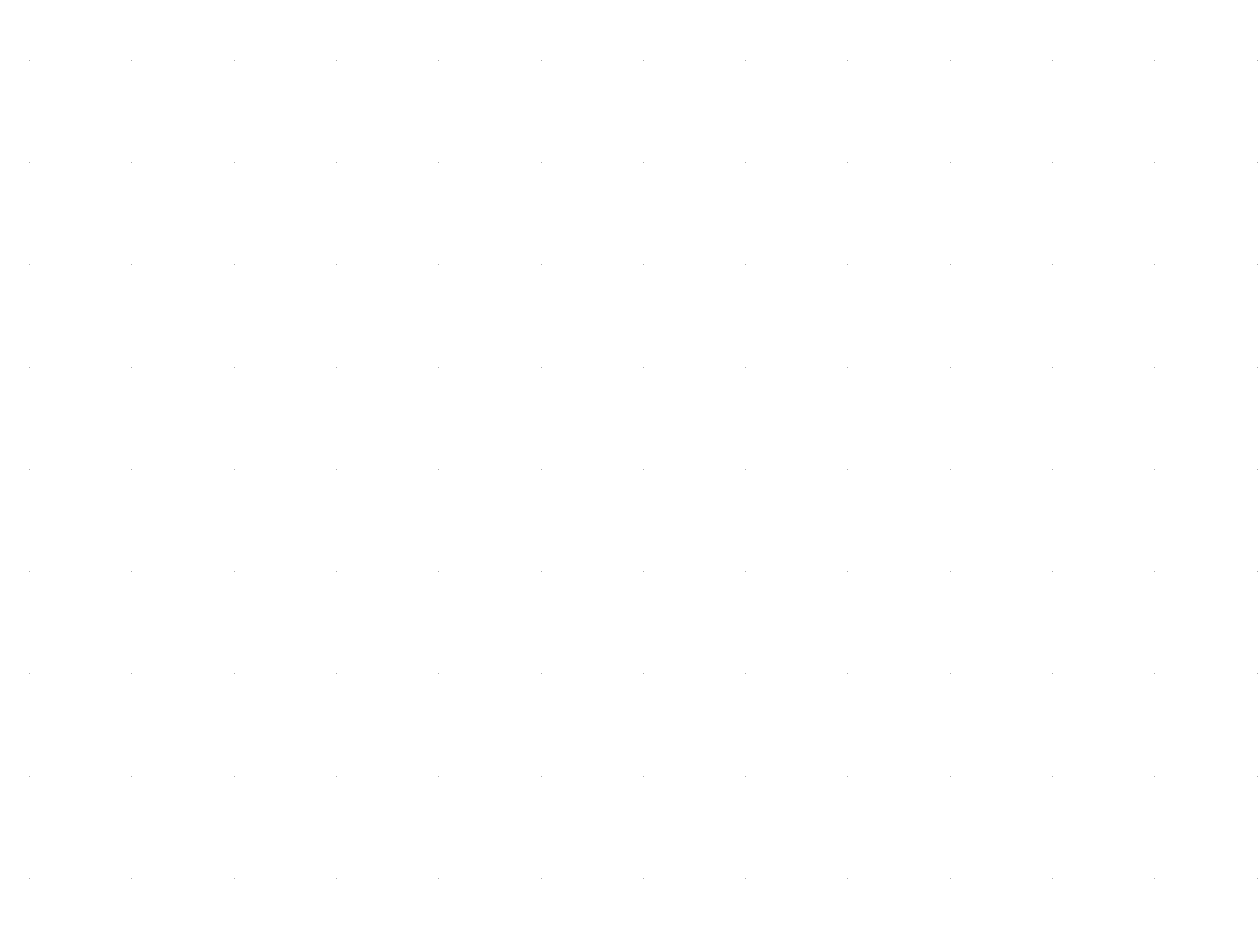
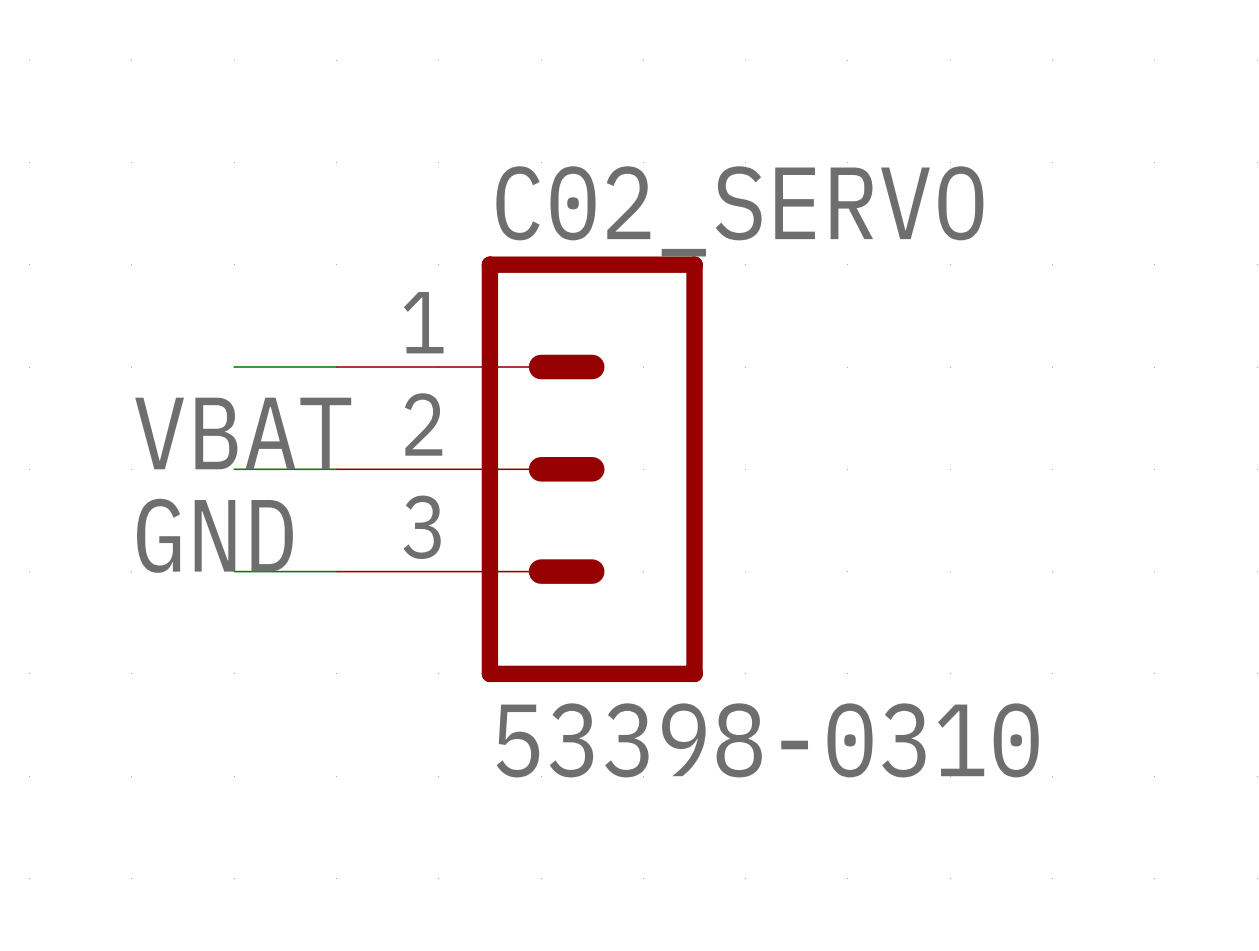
wire: none -> (234, 367) (336, 367)
label: none -> VBAT (243, 433)
wire: none -> (234, 469) (336, 469)
C02_SERVO: none -> 53398-0310 (519, 469)
label: none -> GND (214, 535)
wire: none -> (234, 571) (336, 571)

